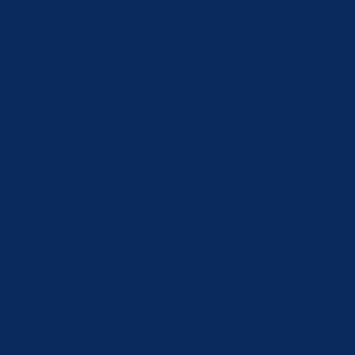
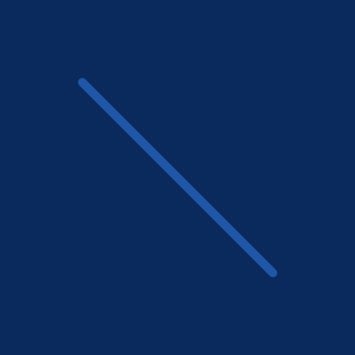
track: none -> (82, 82) (272, 272)

